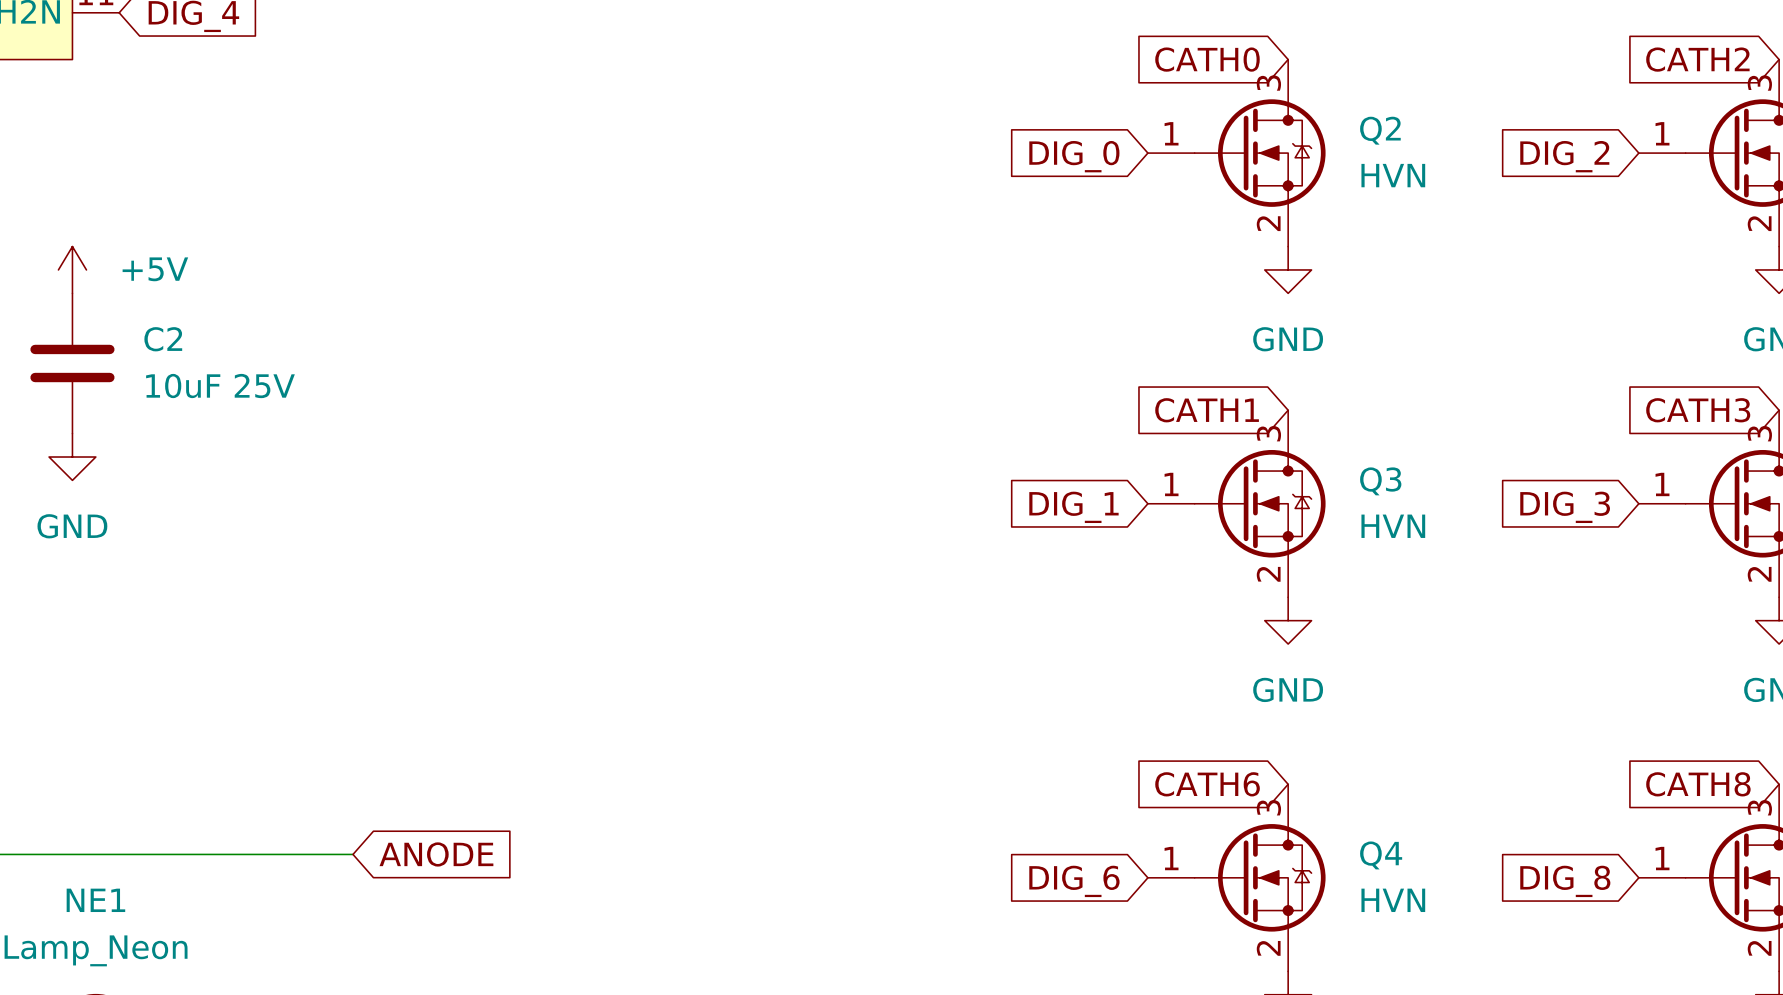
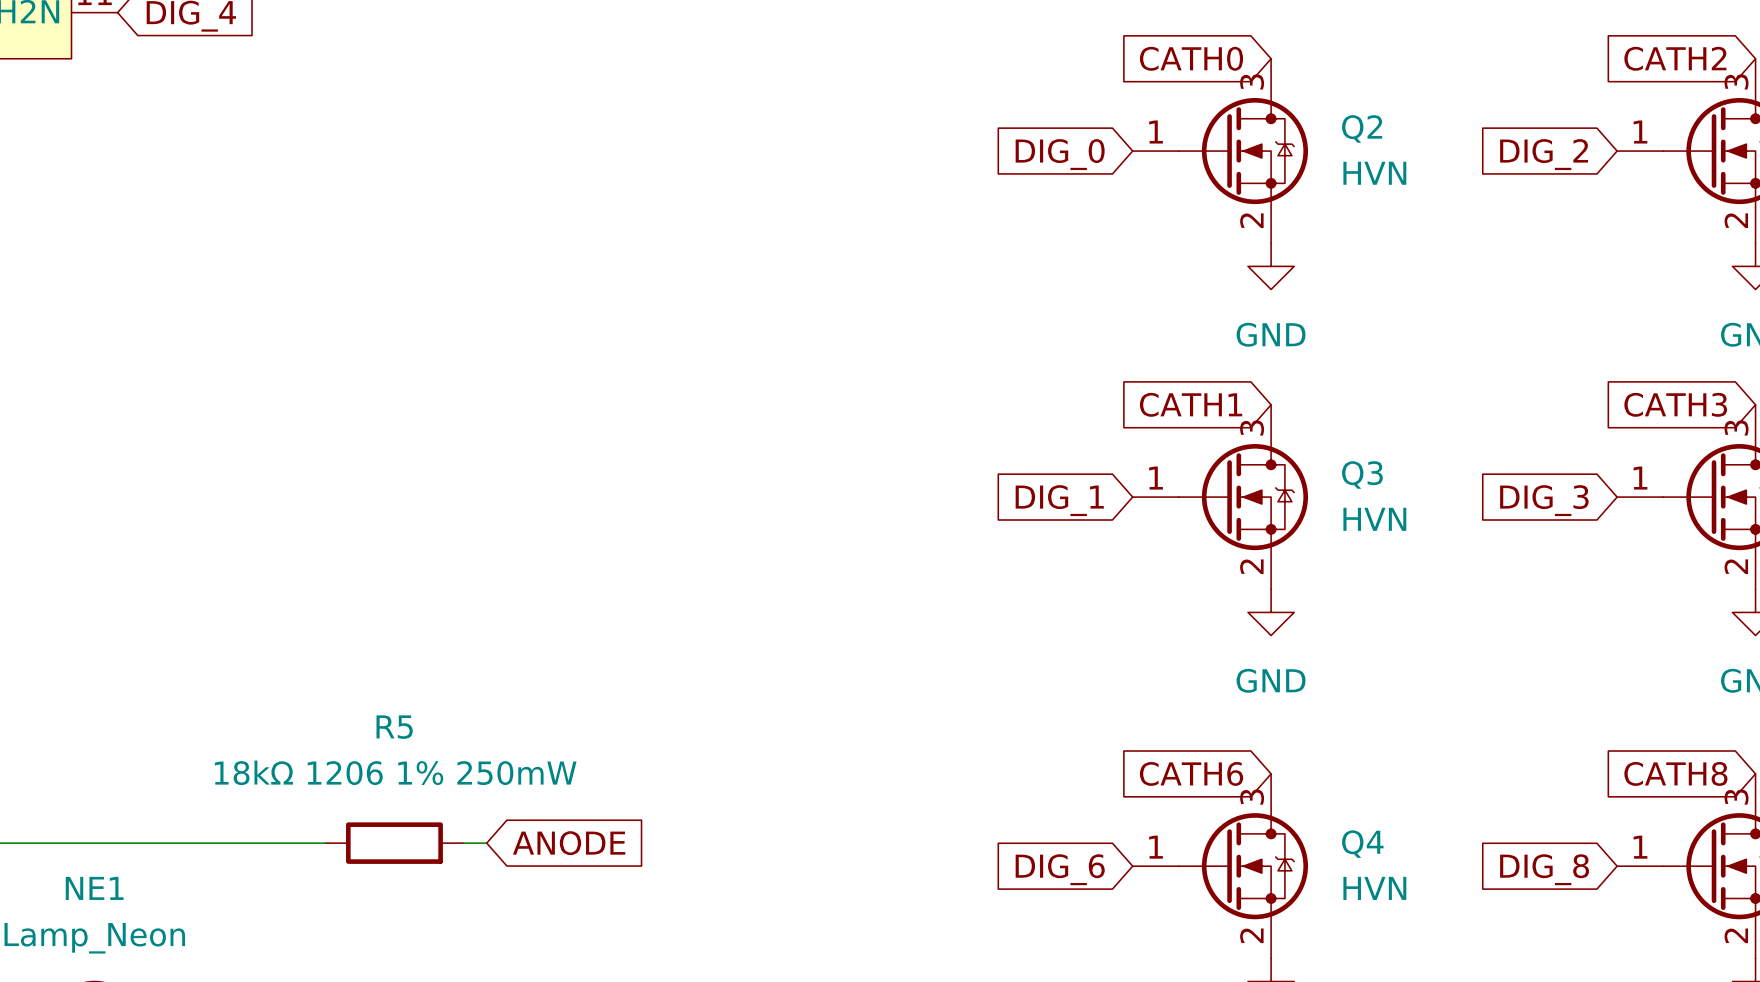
power symbol: +5V (72, 269) -> none
C2: 10uF 25V (72, 363) -> none
power symbol: GND (72, 457) -> none
R5: none -> 18kΩ 1206 1% 250mW (394, 843)
global label position: ANODE (436, 854) -> ANODE (569, 843)

